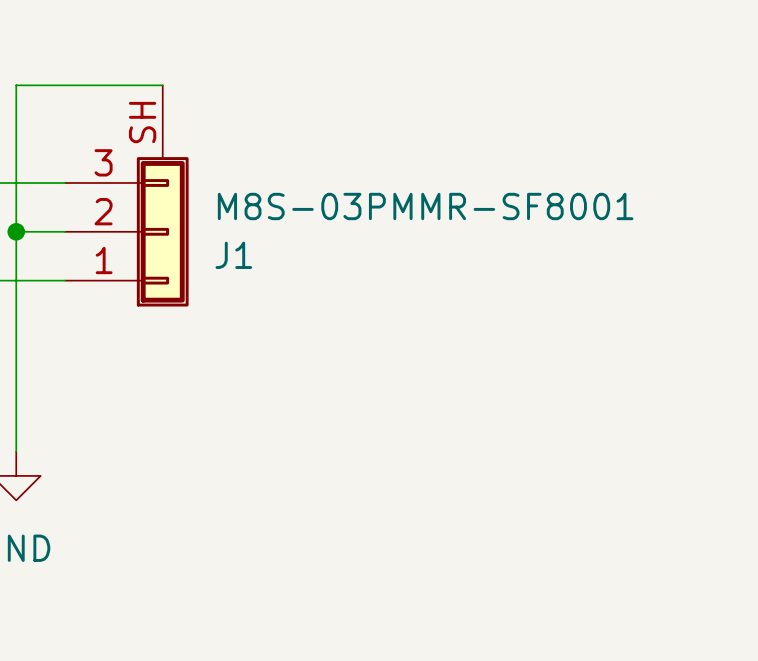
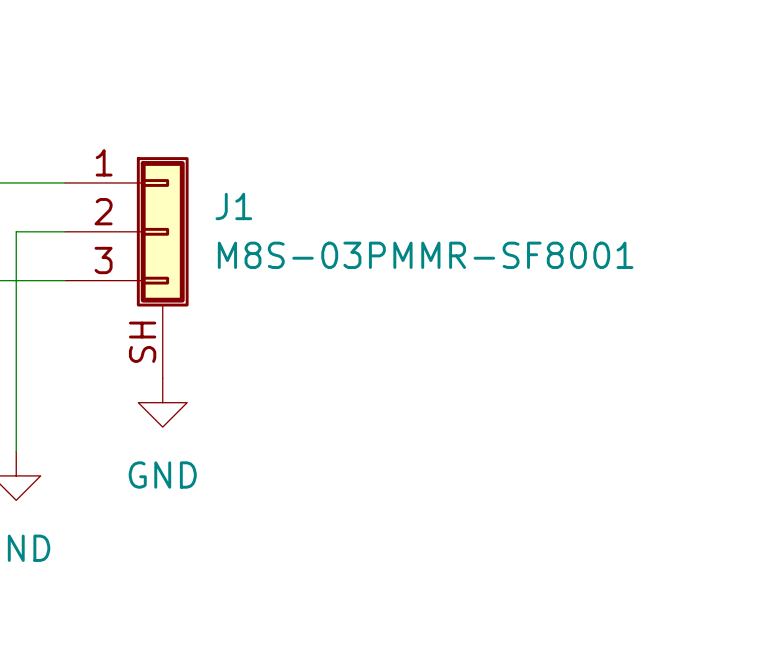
wire: (162, 85) (16, 85) (16, 231) -> none
junction: (16, 231) -> none
J1 flip: as is (162, 231) -> up-down (162, 231)
power symbol: none -> GND (162, 402)

